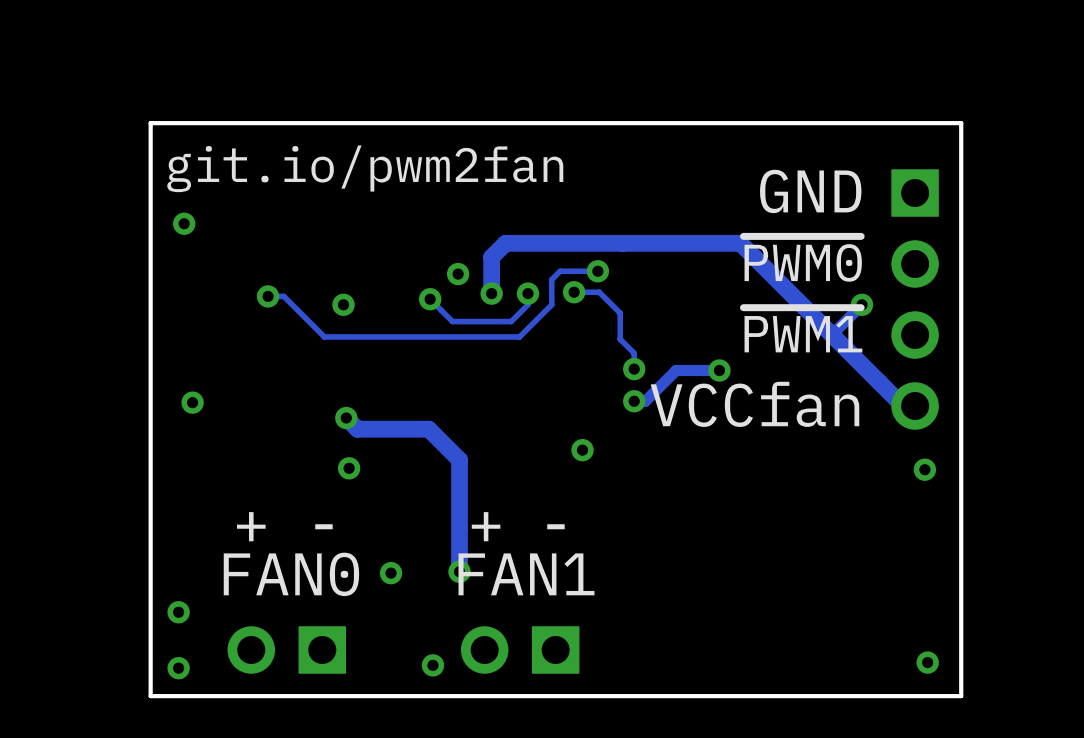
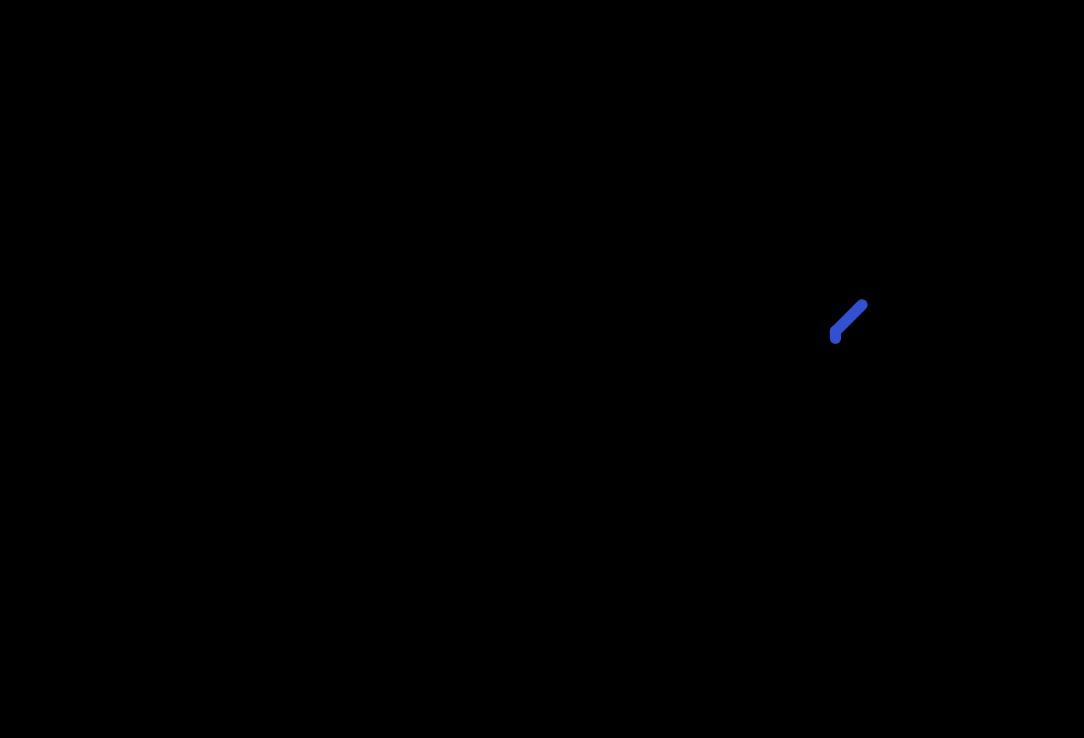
board edge: (961, 123) (961, 696) (150, 696) (150, 123) (961, 123) -> none
text: git.io/pwm2fan (365, 168) -> none
text: GND (810, 191) -> none
via: (184, 223) -> none
text: ~{PWM0} (802, 259) -> none
track: (597, 271) (560, 271) (551, 279) (551, 304) (519, 336) (324, 336) (283, 296) (268, 296) -> none
via: (597, 271) -> none
via: (458, 274) -> none
track: (574, 292) (599, 292) (620, 313) (620, 339) (634, 353) (634, 369) -> none
via: (574, 292) -> none
track: (491, 293) (491, 257) (505, 243) (740, 243) (898, 401) -> none
via: (491, 293) -> none
track: (527, 293) (527, 304) (511, 321) (452, 321) (430, 299) -> none
via: (527, 293) -> none
via: (268, 296) -> none
via: (430, 299) -> none
part: (915, 299) -> none
via: (343, 304) -> none
via: (862, 304) -> none
text: ~{PWM1} (802, 330) -> none
via: (634, 369) -> none
track: (719, 370) (676, 370) (645, 401) (634, 401) -> none
via: (719, 370) -> none
via: (634, 401) -> none
via: (192, 402) -> none
text: VCCfan (754, 404) -> none
track: (346, 418) (357, 429) (428, 429) (459, 459) (459, 571) -> none
via: (346, 418) -> none
via: (582, 450) -> none
via: (349, 468) -> none
via: (924, 469) -> none
text: + (251, 526) -> none
text: - (323, 526) -> none
text: + (486, 526) -> none
text: - (555, 526) -> none
via: (459, 571) -> none
via: (391, 573) -> none
text: FAN0 (291, 574) -> none
text: FAN1 (526, 574) -> none
via: (178, 612) -> none
part: (286, 650) -> none
part: (520, 650) -> none
via: (927, 662) -> none
via: (432, 665) -> none
via: (178, 668) -> none

